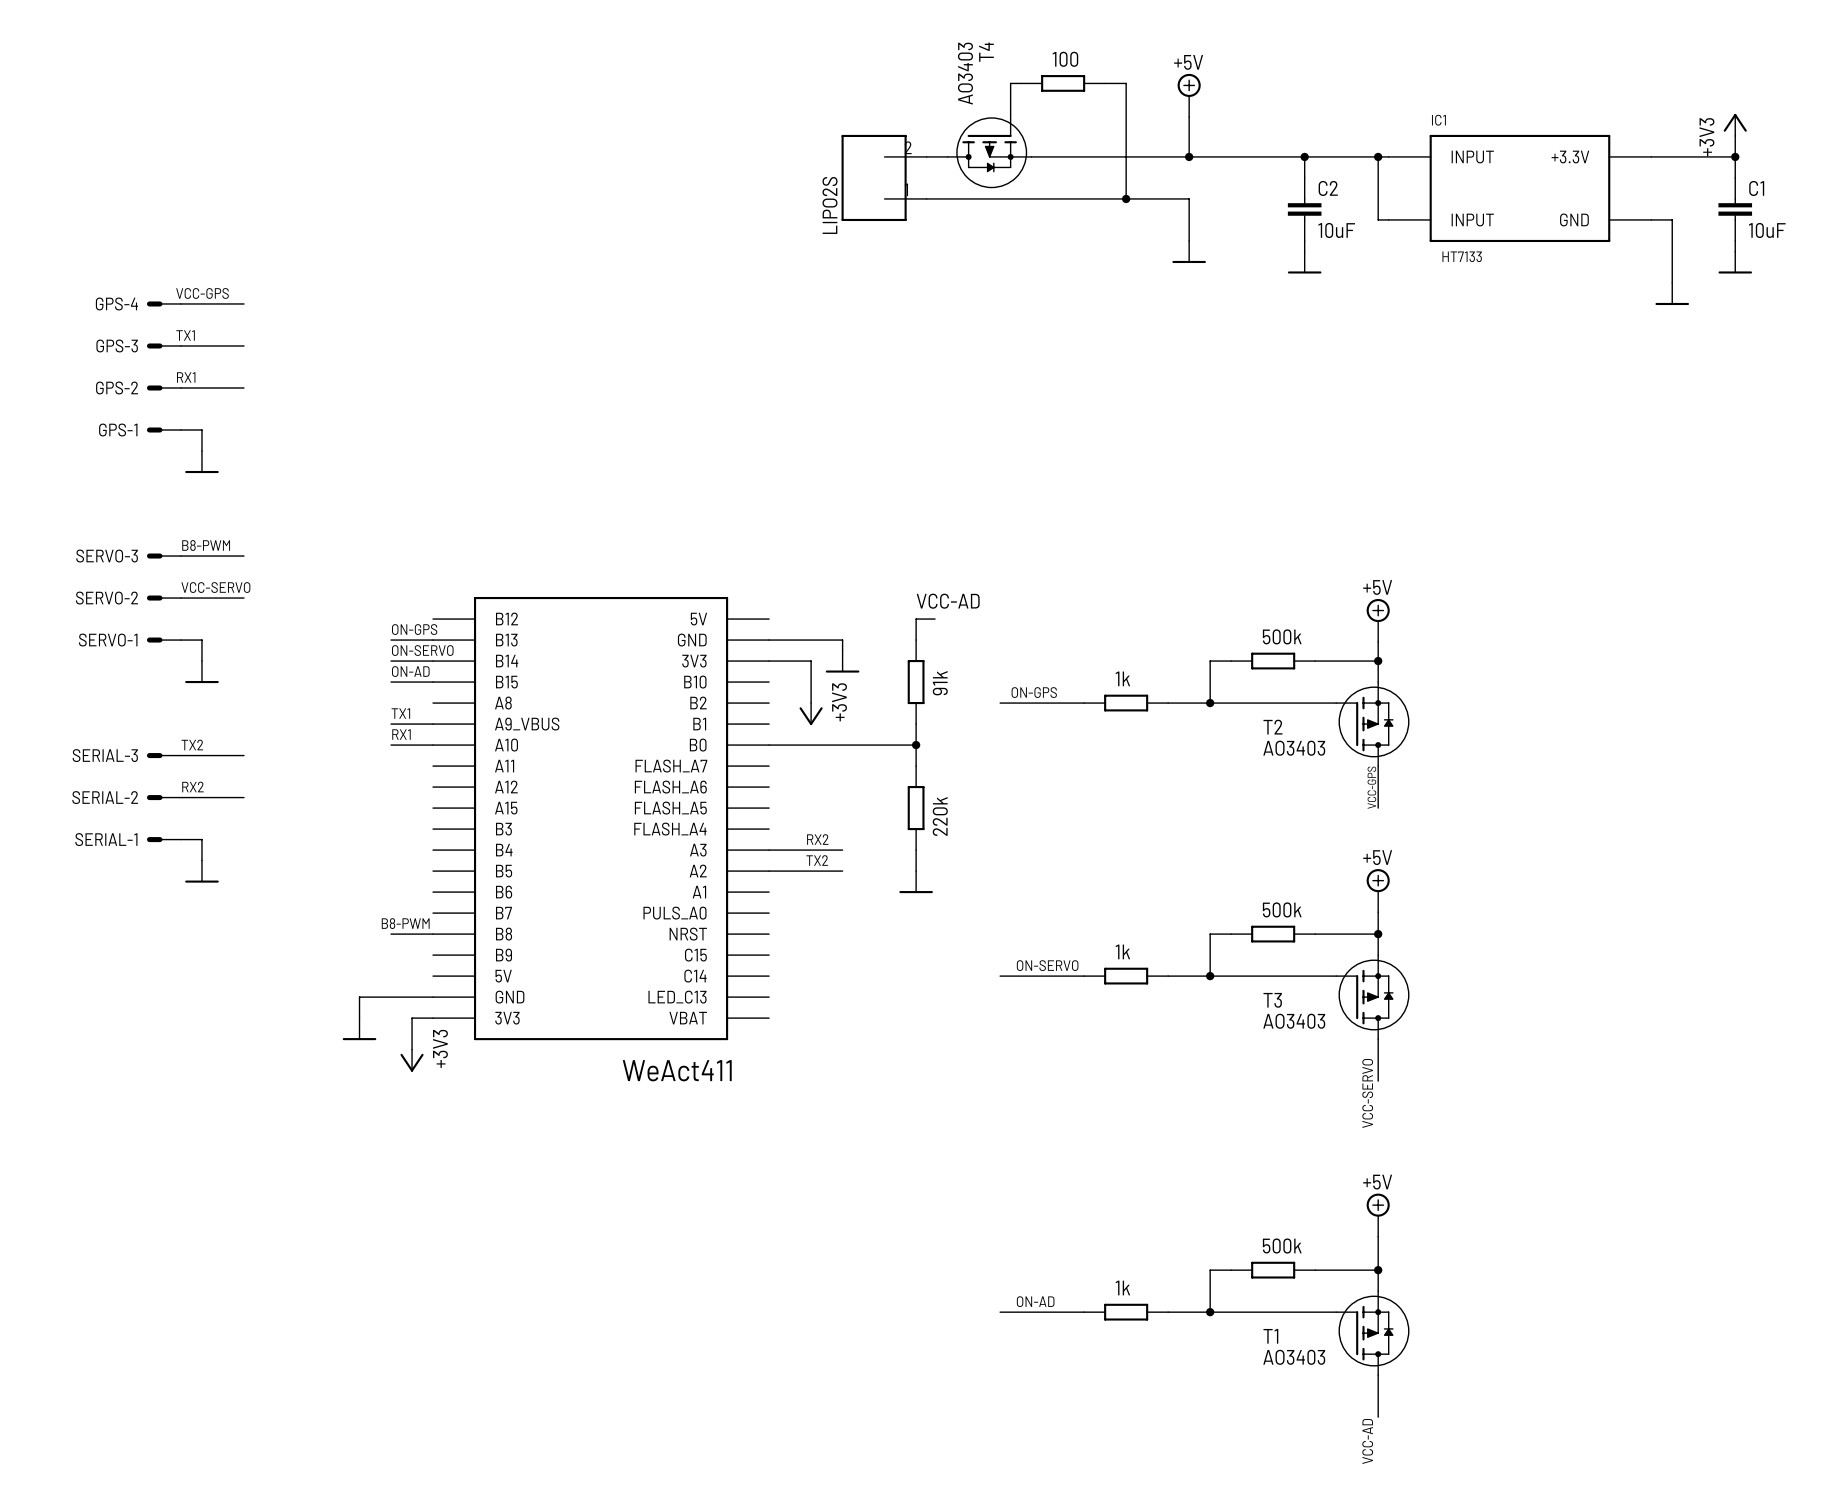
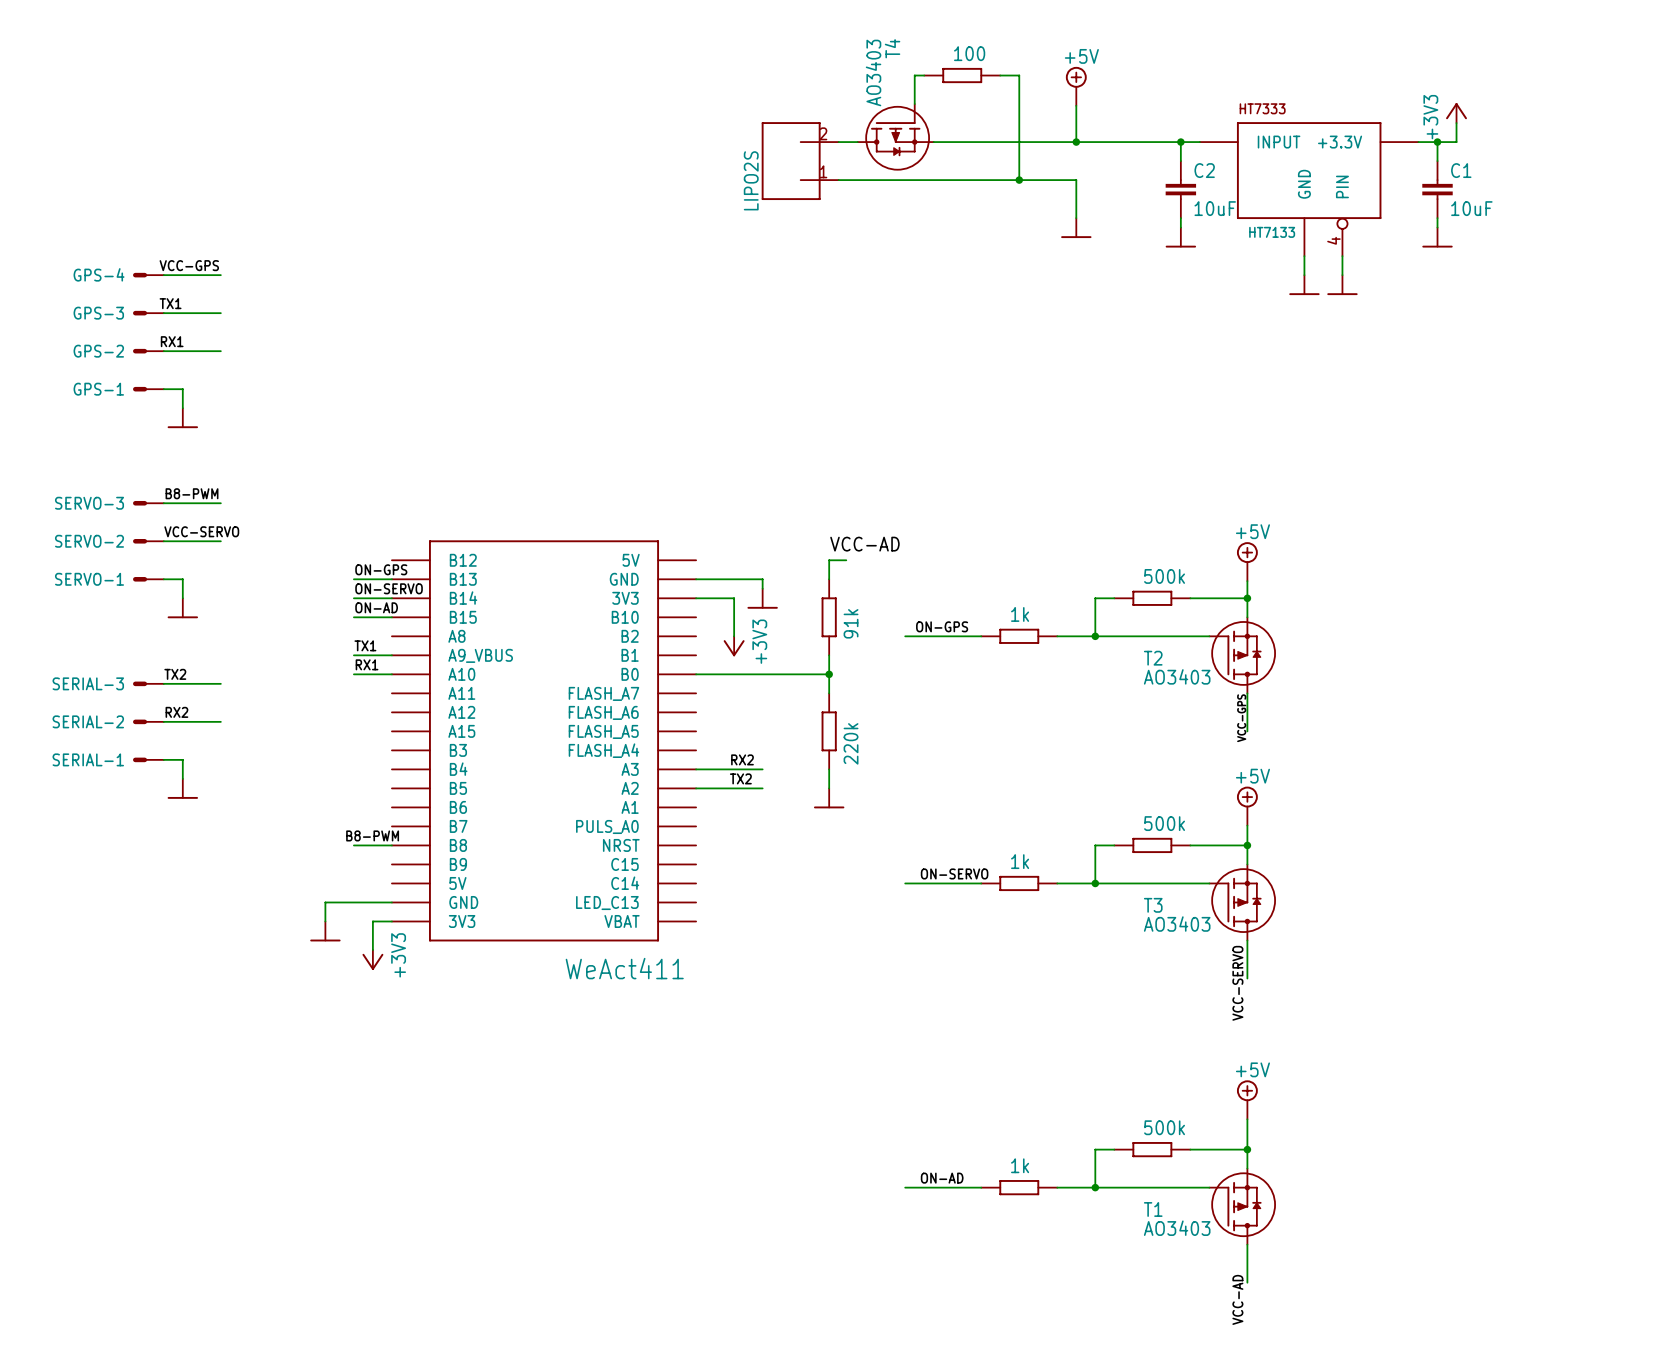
power symbol position: +3V3 (1735, 124) -> +3V3 (1456, 113)
wire: none -> (1456, 123) (1456, 142) (1418, 142)
wire: (1735, 135) (1735, 177) -> none
wire: (1378, 156) (1378, 219) (1388, 219) -> none
junction: (1378, 156) -> none
wire: none -> (1437, 142) (1437, 161)
junction: none -> (1437, 142)
wire: (1651, 156) (1735, 156) -> none
junction: (1735, 156) -> none
IC1: (1519, 188) -> none
HT7333: none -> (1309, 189)
C1 position: (1735, 209) -> (1437, 189)
wire: (1651, 219) (1672, 219) (1672, 282) -> none
wire: (1735, 240) (1735, 251) -> (1437, 218) (1437, 227)
power symbol: none -> (1437, 237)
power symbol: (1735, 262) -> none
wire: none -> (1304, 256) (1304, 275)
wire: none -> (1342, 256) (1342, 275)
power symbol: (1672, 294) -> none
power symbol: none -> (1304, 285)
power symbol: none -> (1342, 285)

